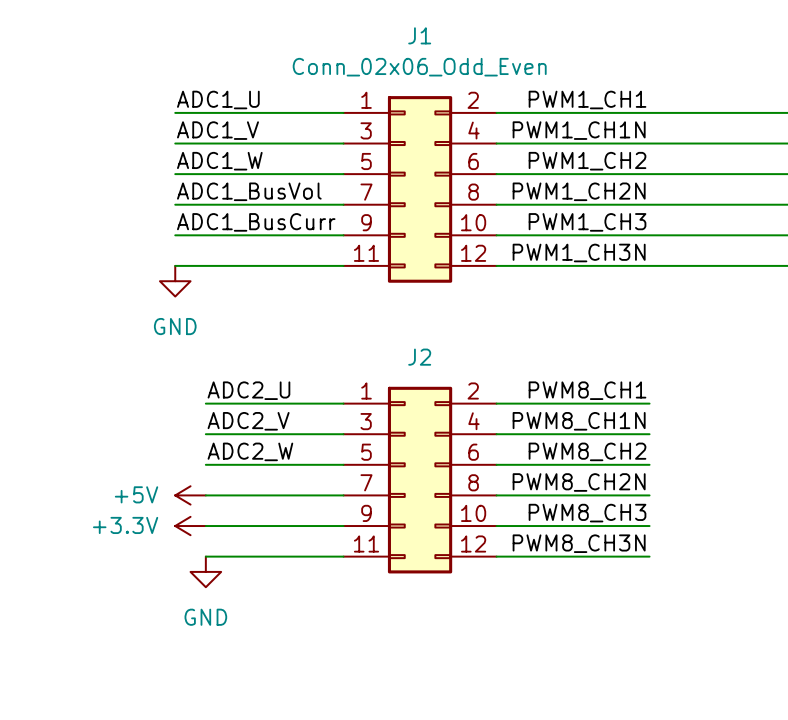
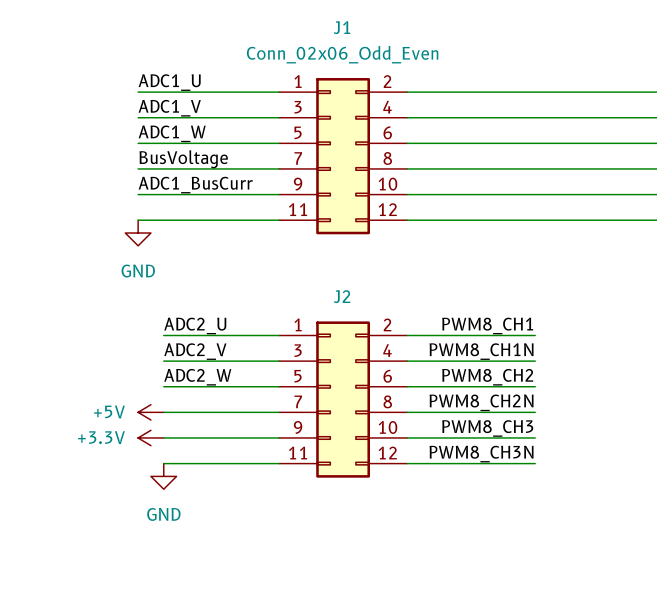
label: PWM1_CH1 (587, 99) -> none
label: PWM1_CH1N (579, 130) -> none
label: PWM1_CH2 (587, 161) -> none
label: ADC1_BusVol (249, 191) -> BusVoltage (183, 159)
label: PWM1_CH2N (579, 191) -> none
label: PWM1_CH3 (587, 222) -> none
label: PWM1_CH3N (579, 252) -> none

